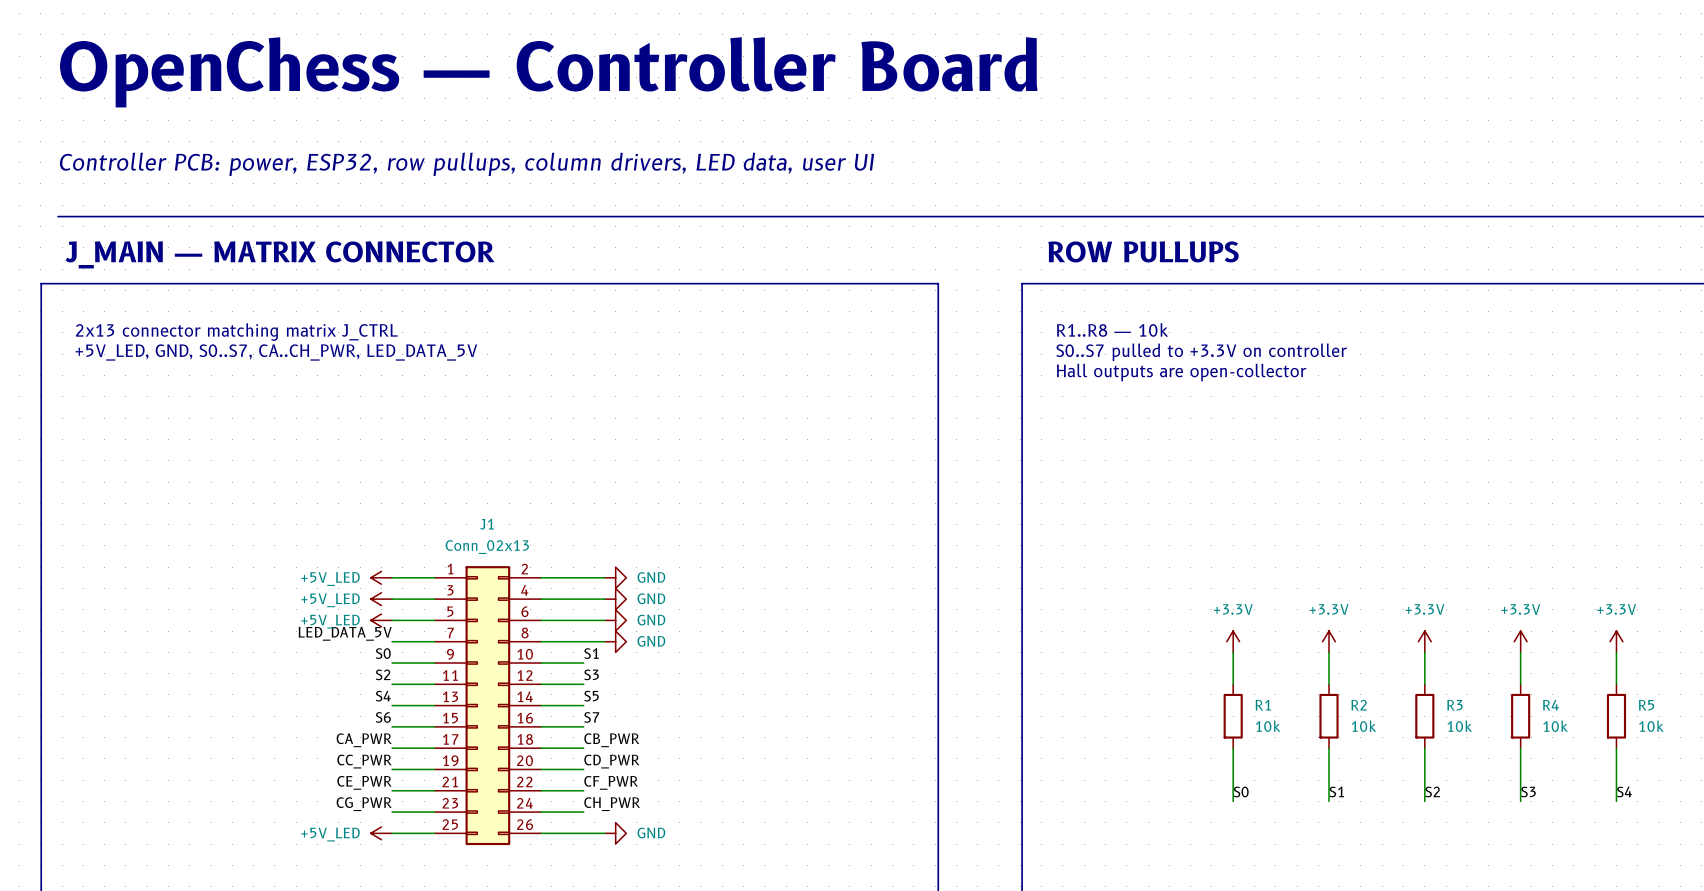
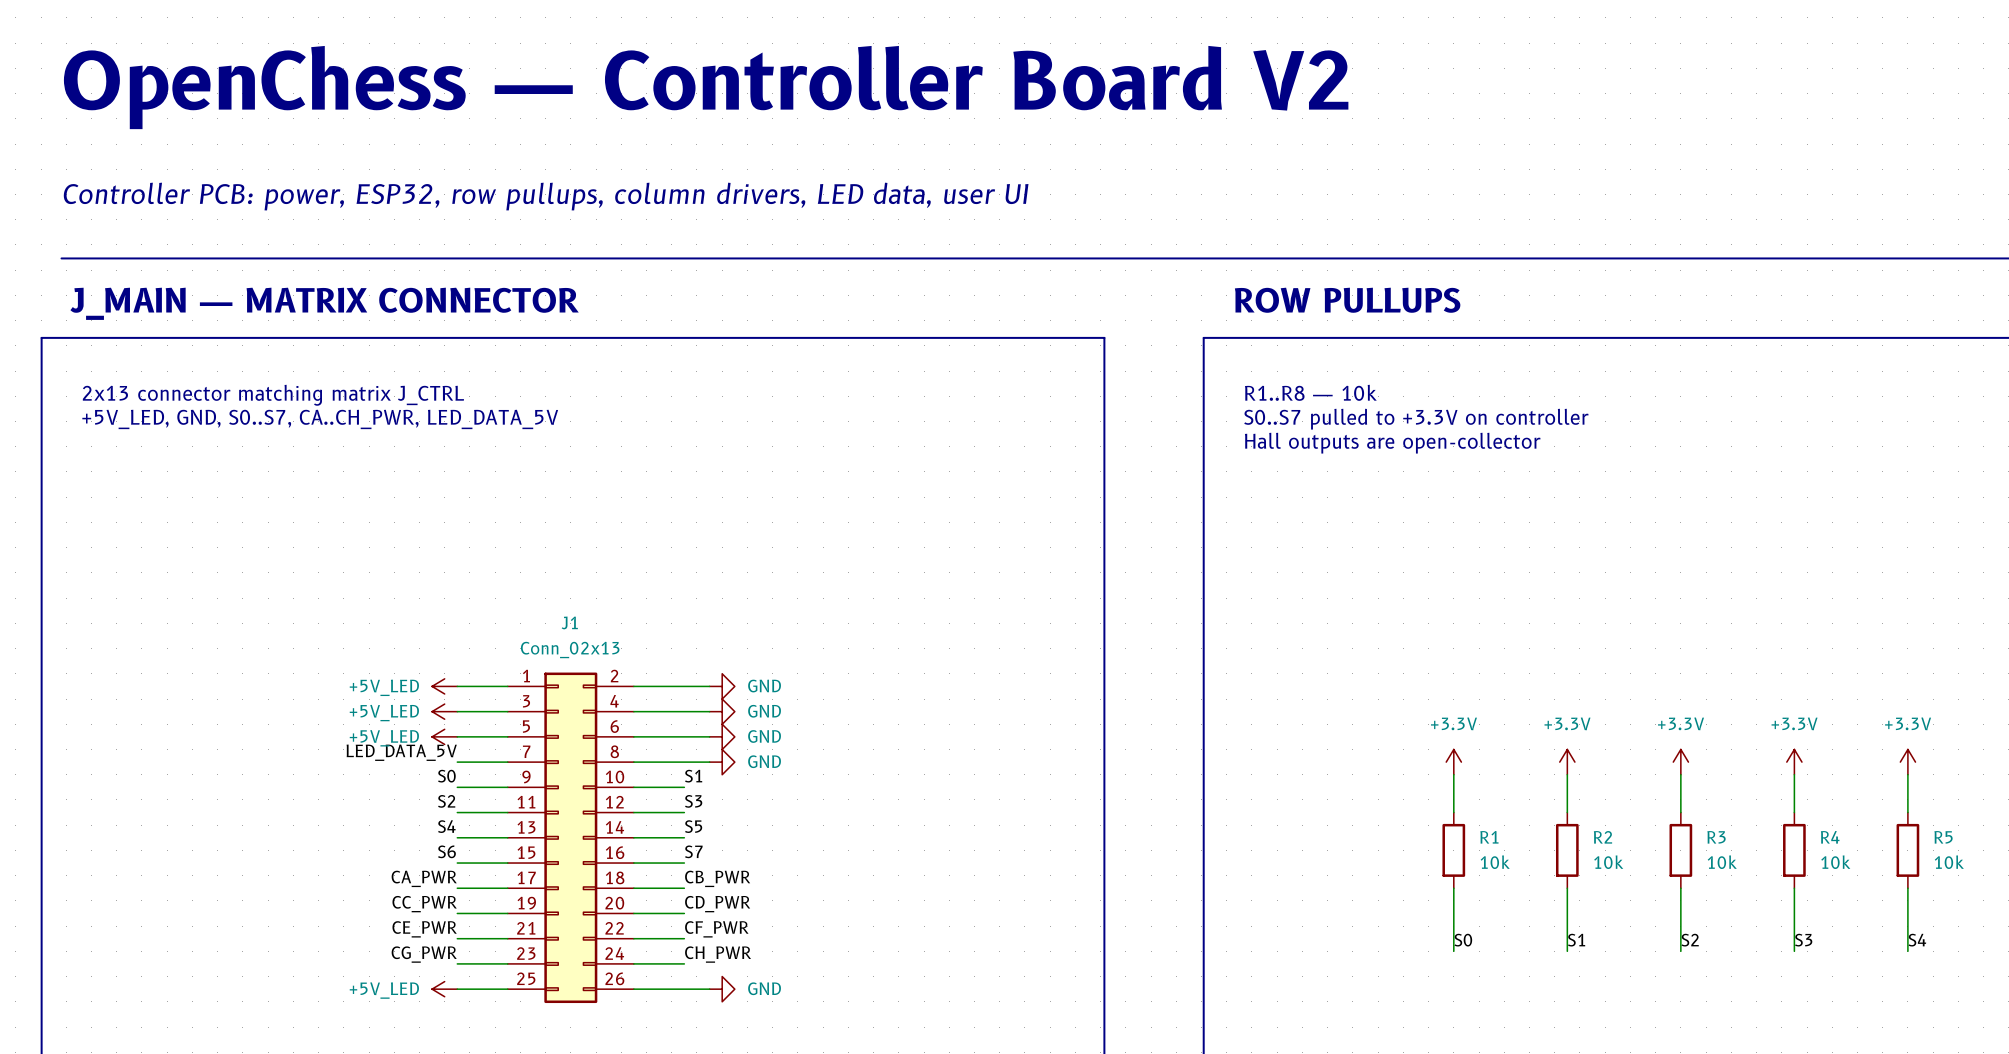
text: OpenChess — Controller Board (548, 72) -> OpenChess — Controller Board V2 (706, 87)

